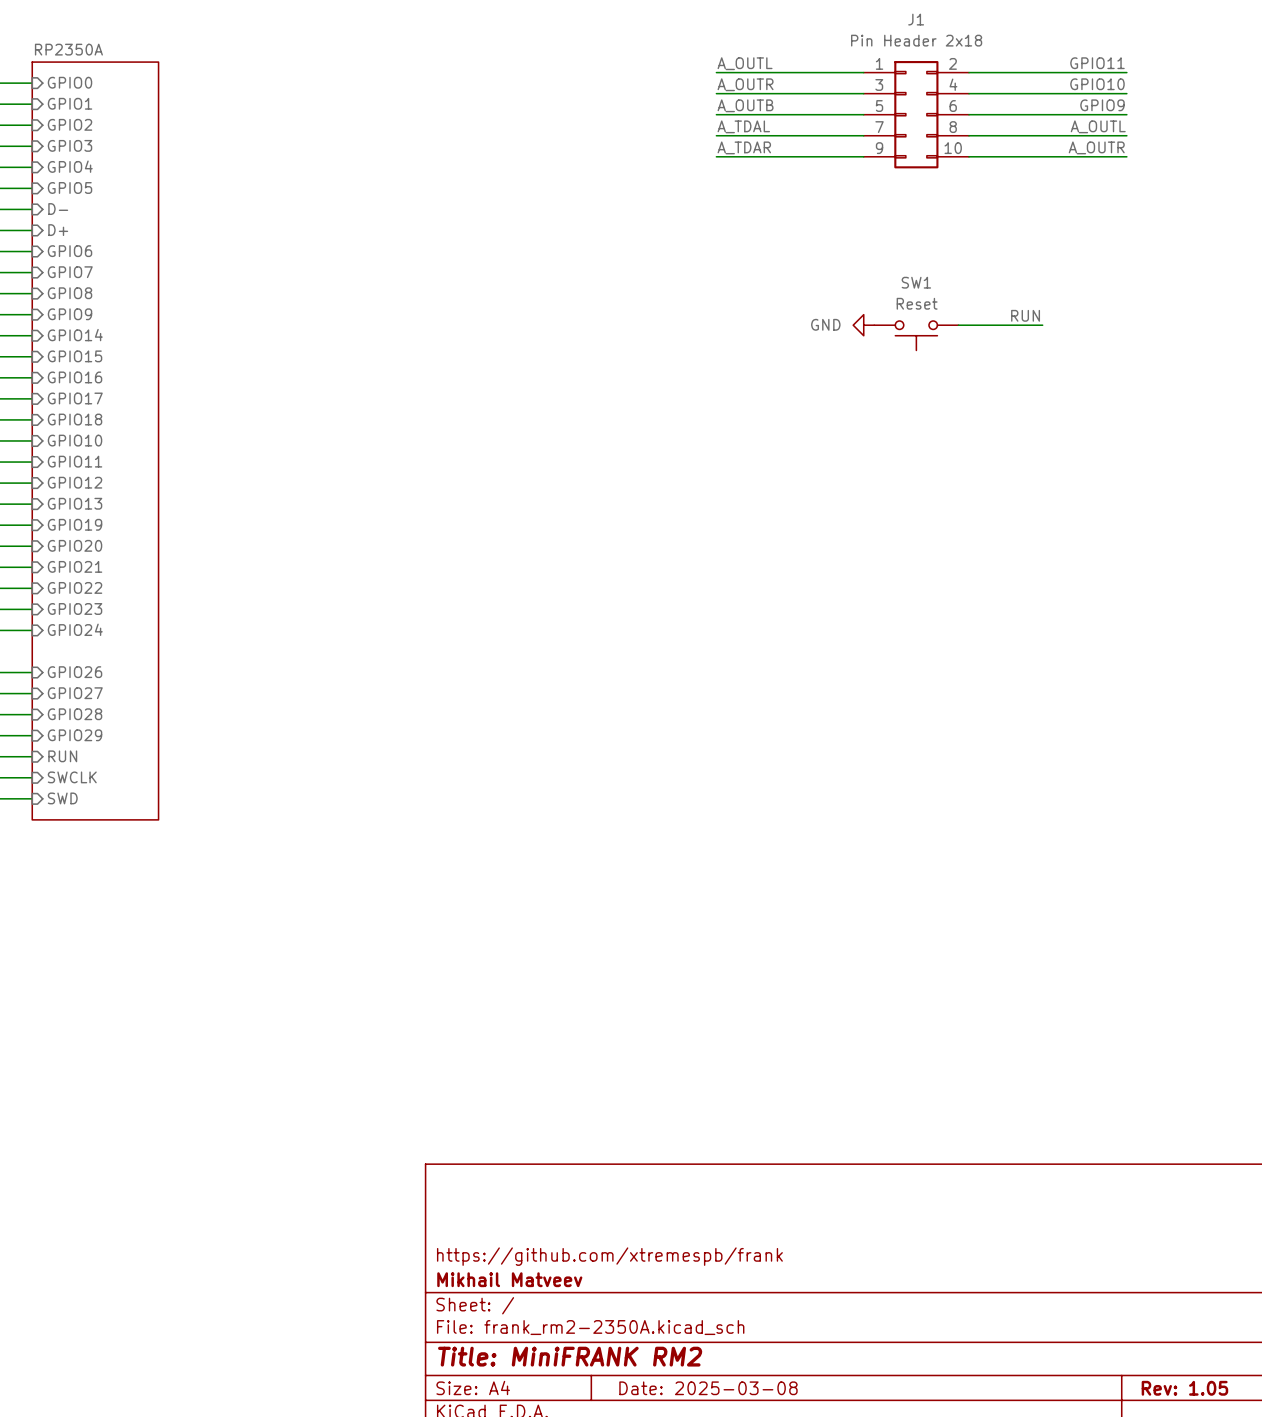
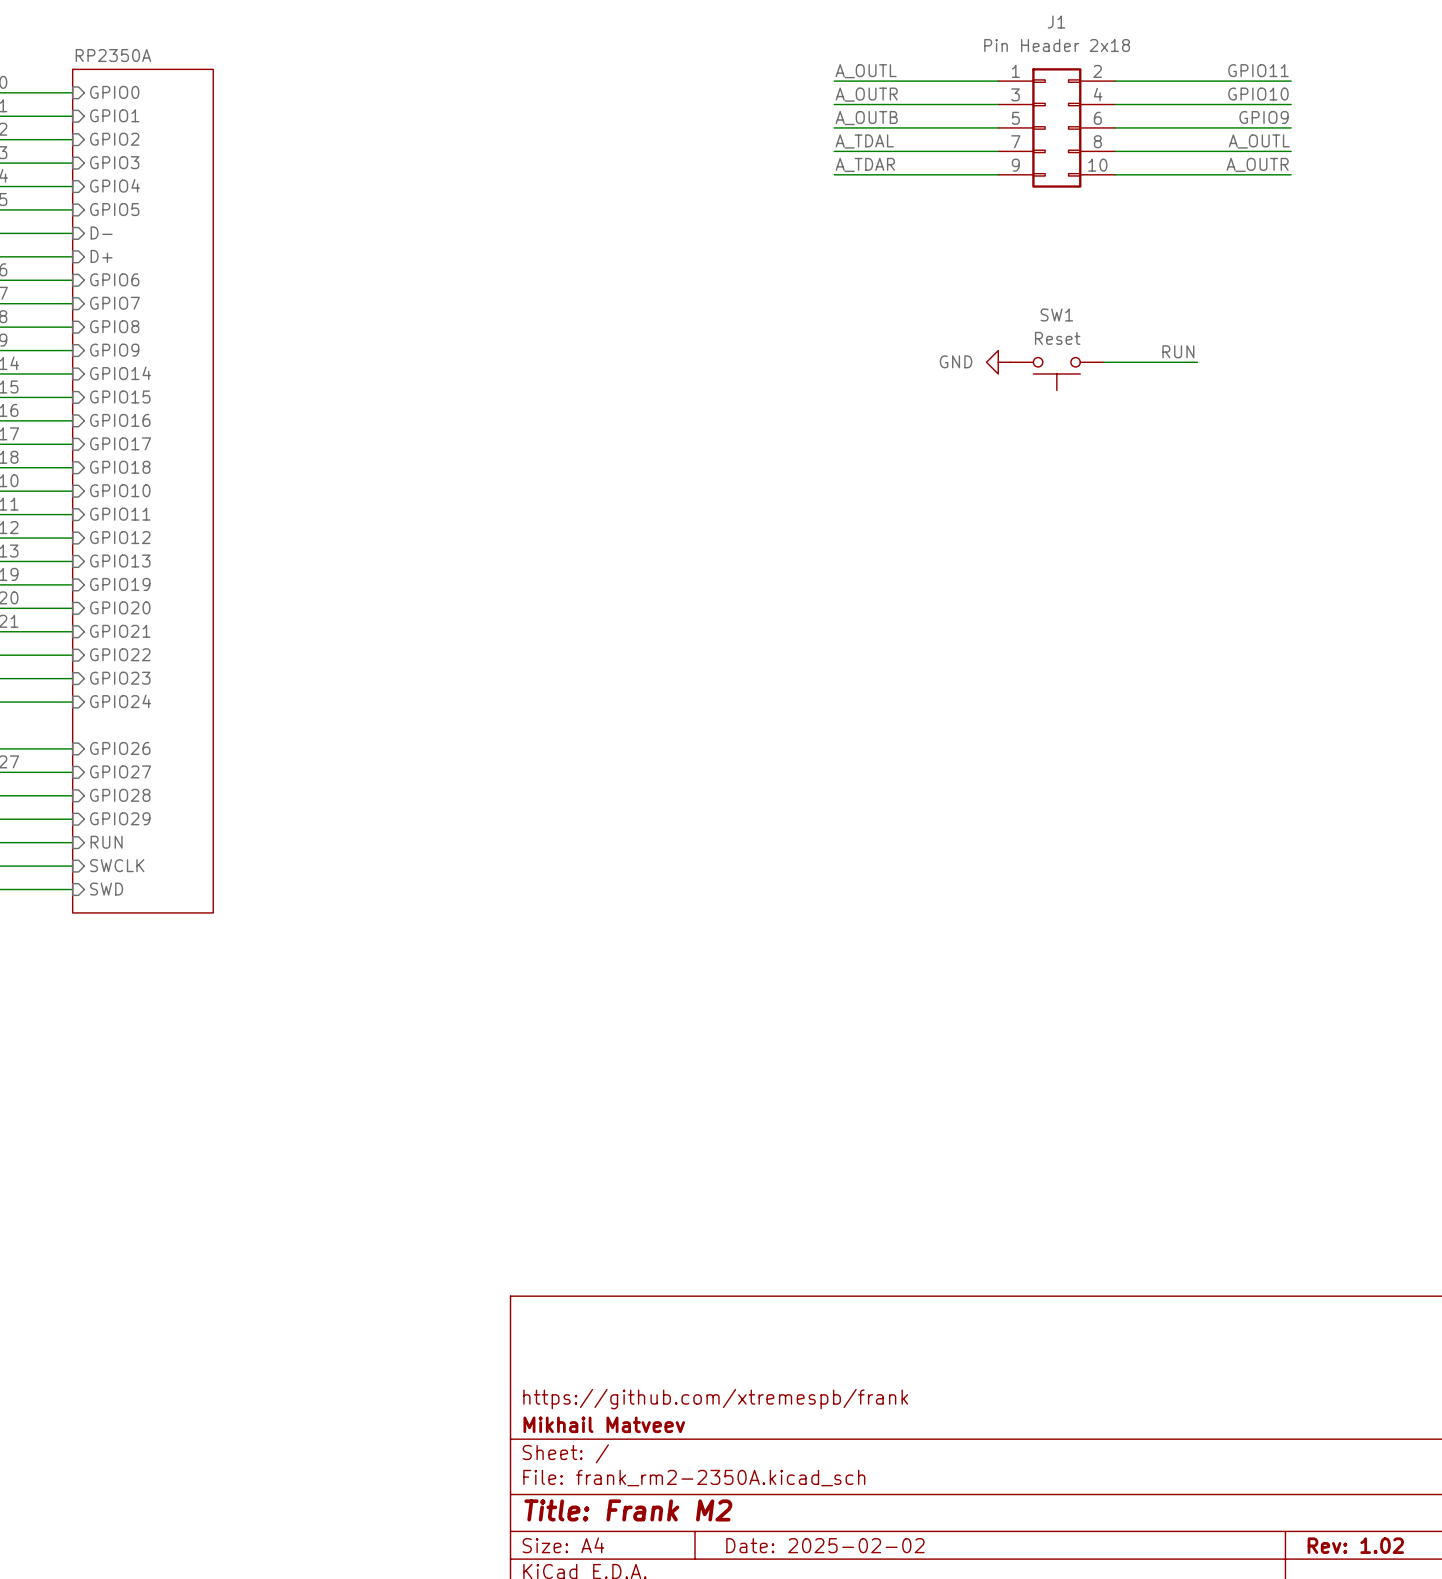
title block: Title: MiniFRANK RM2 (570, 1356) -> Title: Frank M2 (628, 1510)
title block: Date: 2025-03-08 (708, 1388) -> Date: 2025-02-02 (825, 1545)
title block: Rev: 1.05 (1184, 1388) -> Rev: 1.02 (1355, 1545)

